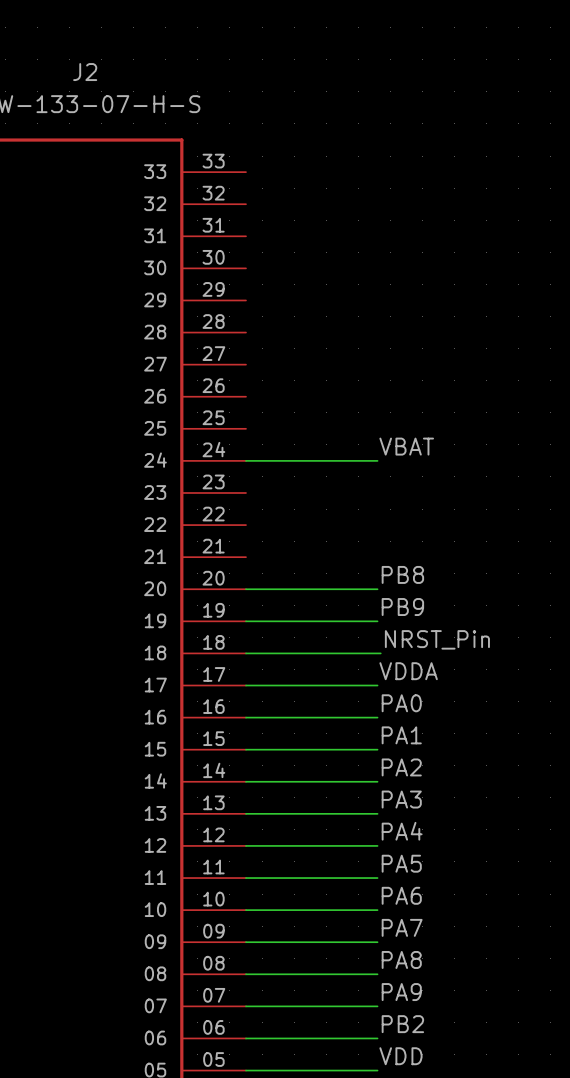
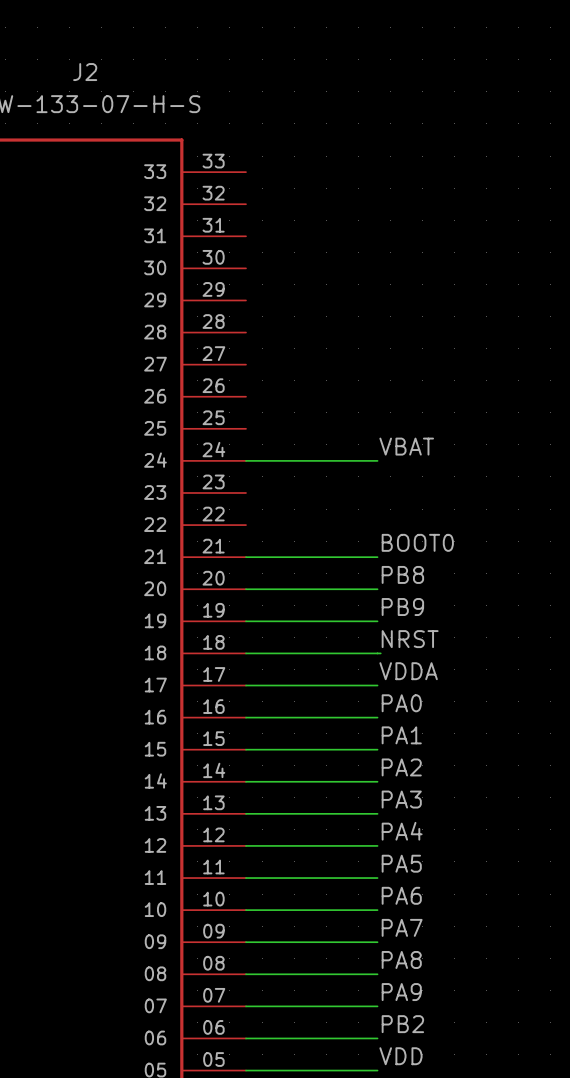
label: none -> BOOT0 (417, 542)
wire: none -> (245, 557) (377, 557)
label: NRST_Pin (437, 639) -> NRST (410, 639)

